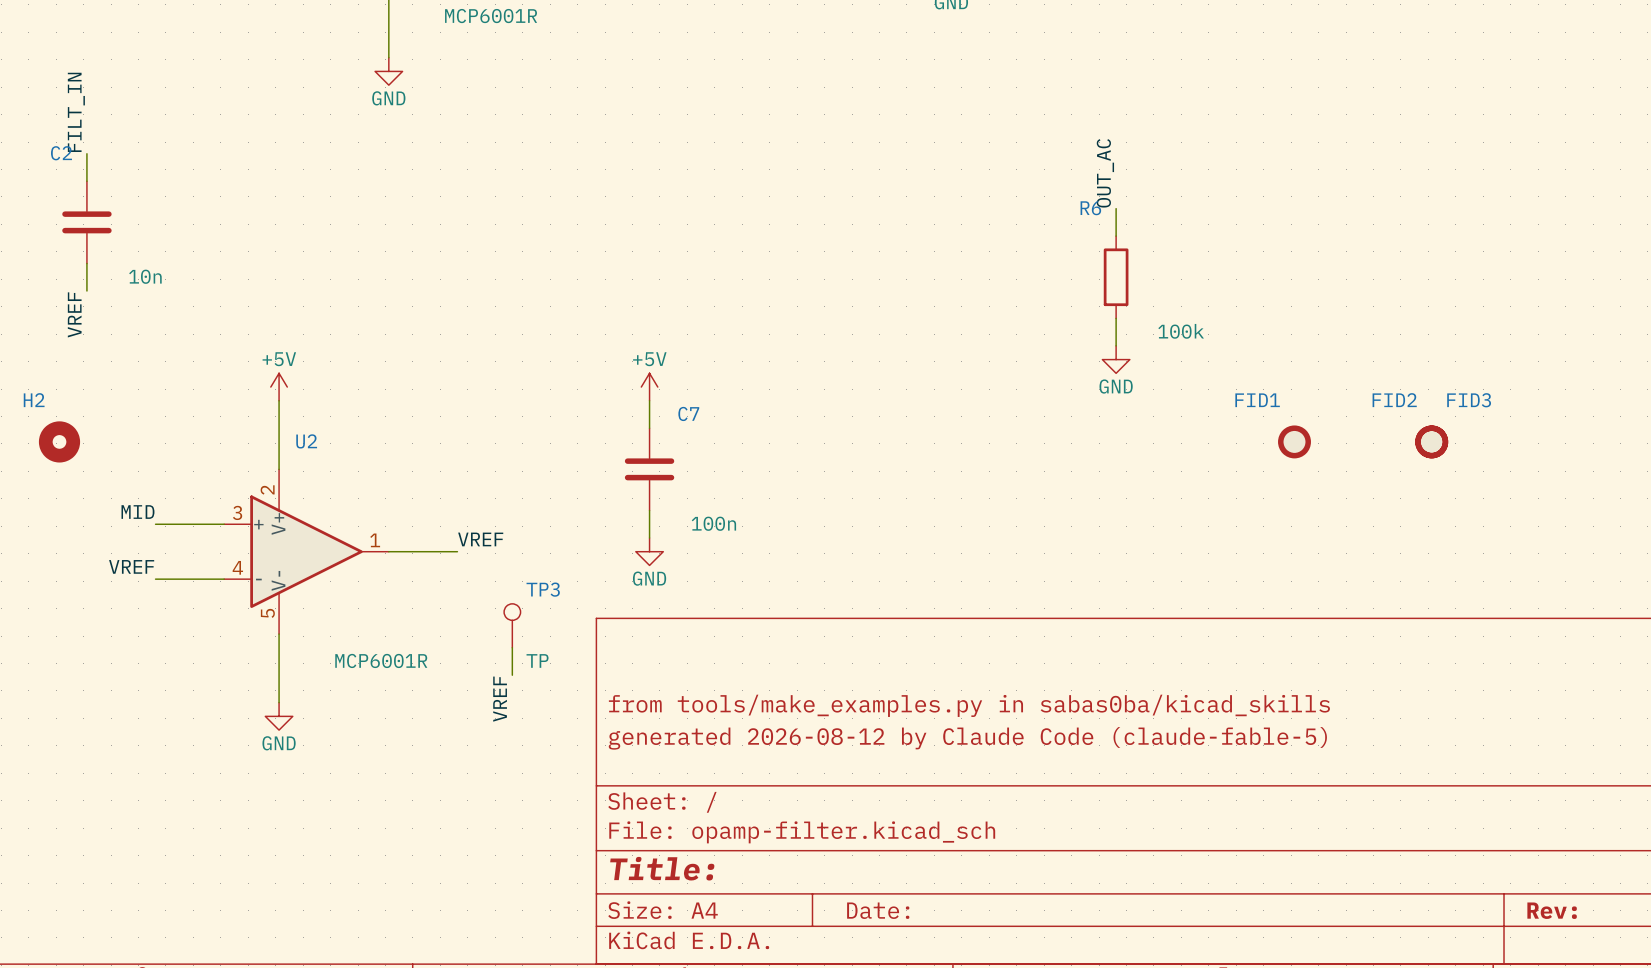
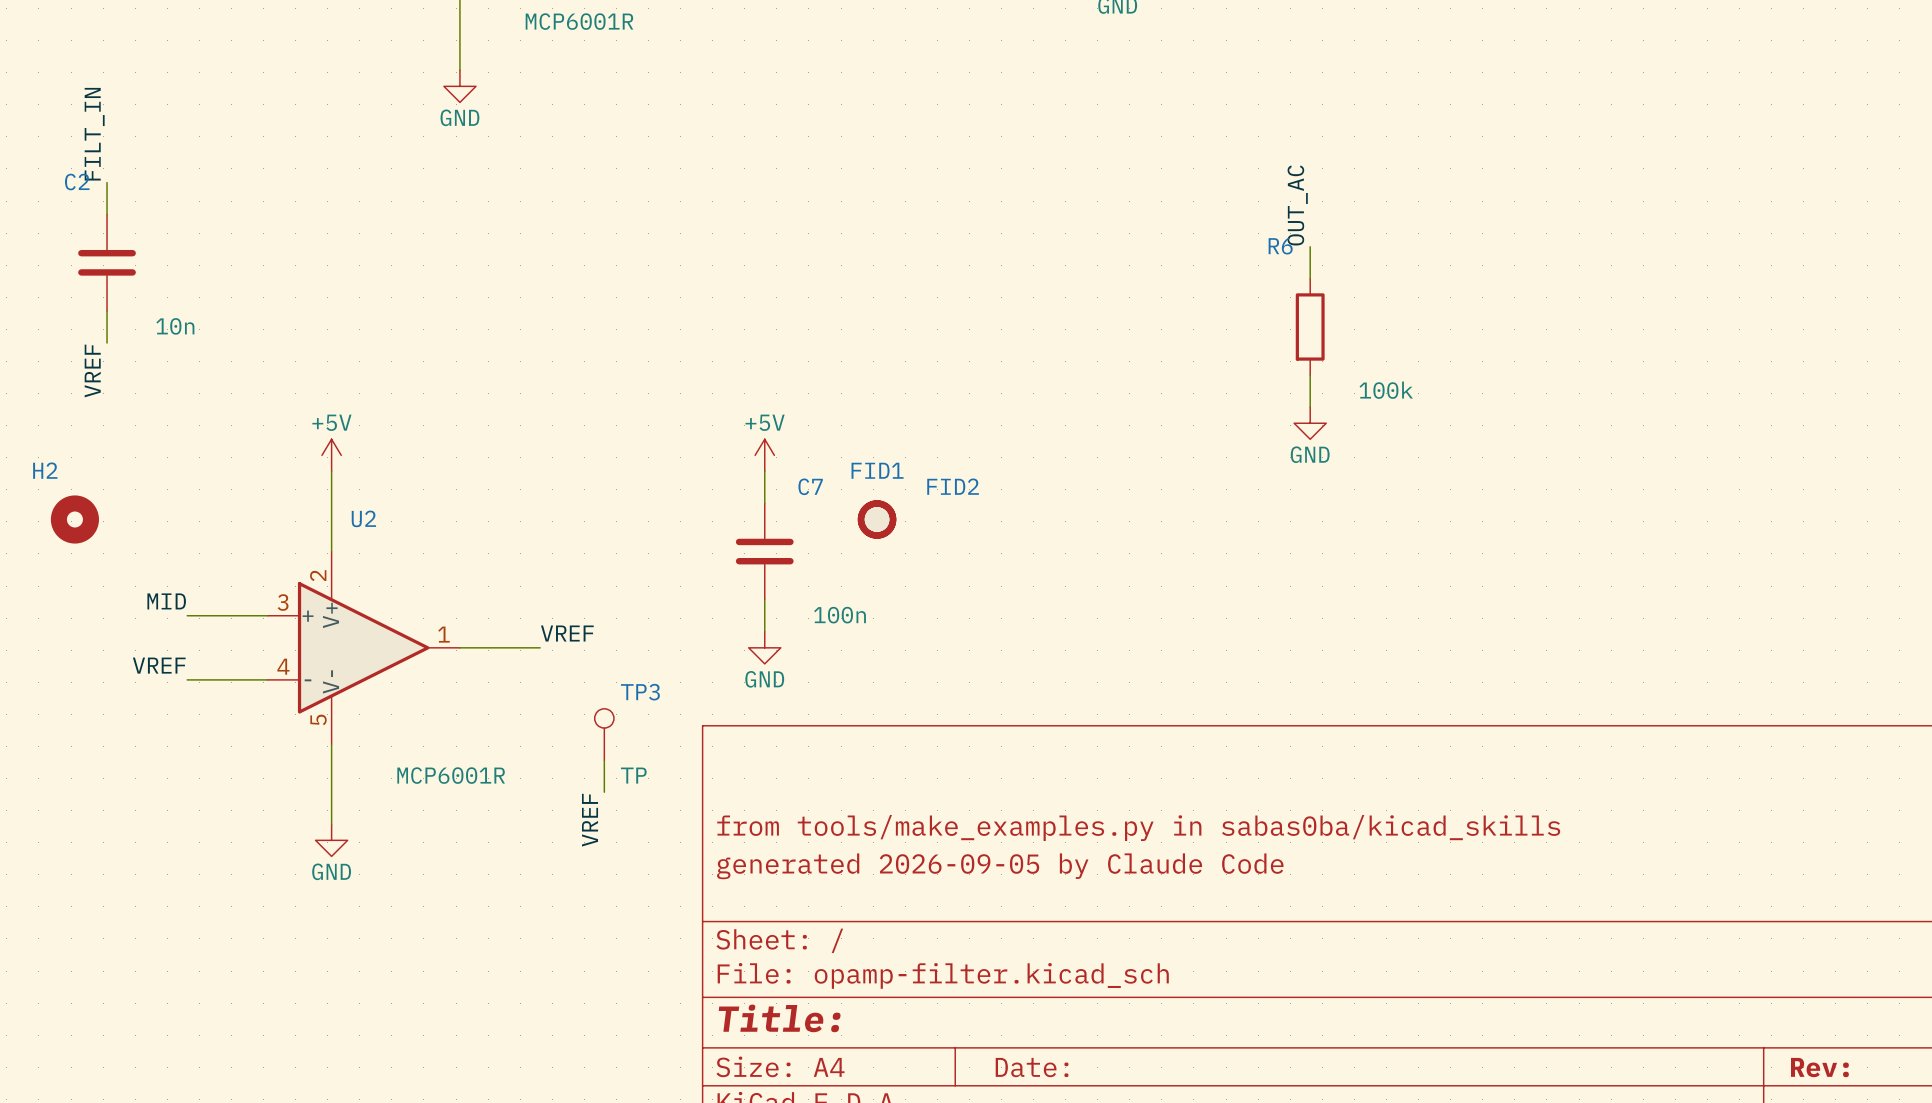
FID1 name position: FID1 (1257, 400) -> FID1 (877, 470)
FID2 name position: FID2 (1394, 400) -> FID2 (953, 486)
FID1 position: (1294, 441) -> (877, 519)
FID2 position: (1431, 441) -> (877, 519)
FID3: (1431, 441) -> none
title block: generated 2026-08-12 by Claude Code (claude-fable-5) (967, 738) -> generated 2026-09-05 by Claude Code (1000, 866)

